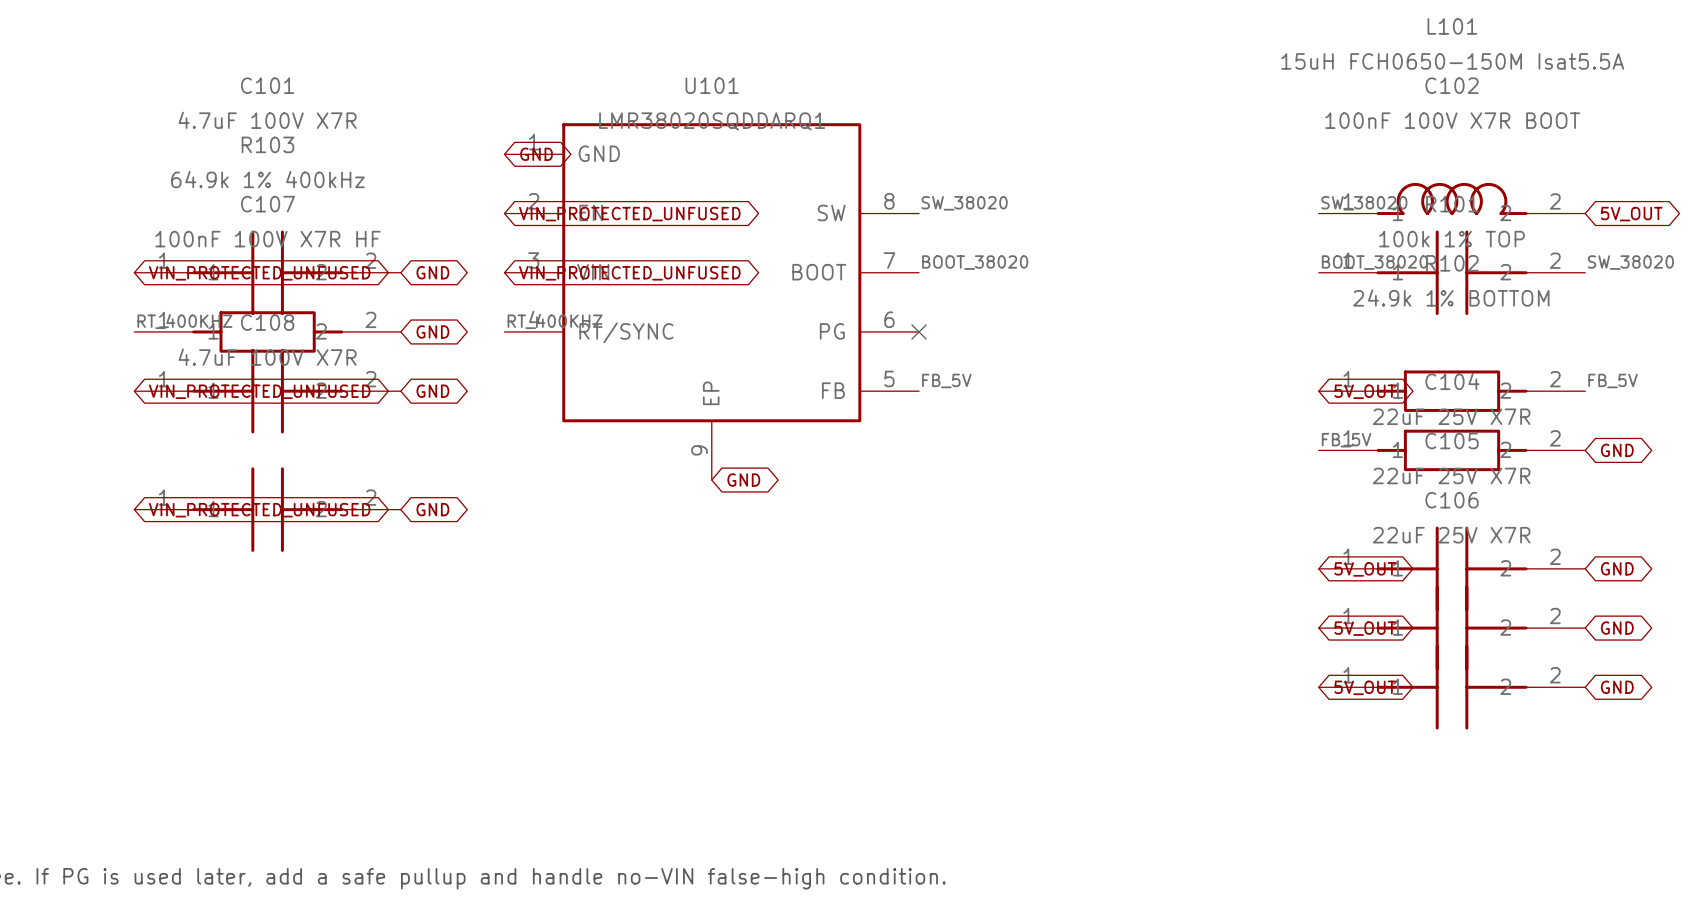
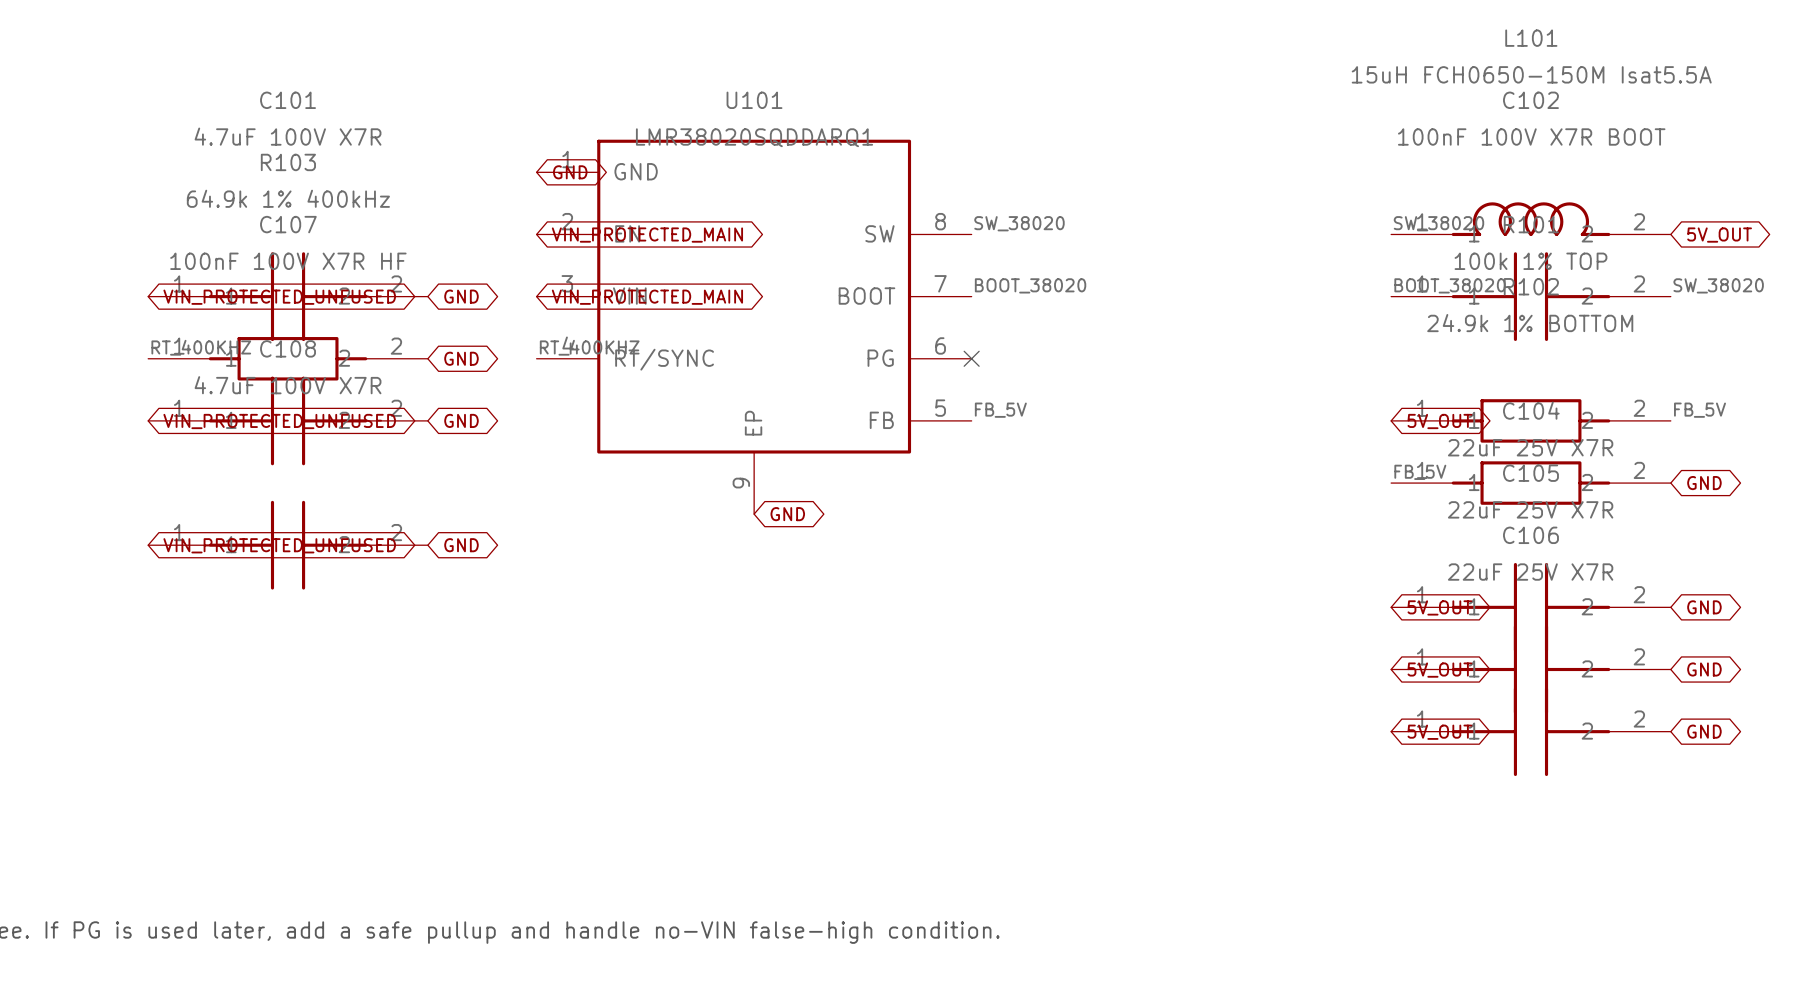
global label: VIN_PROTECTED_UNFUSED (629, 214) -> VIN_PROTECTED_MAIN (647, 235)
global label: VIN_PROTECTED_UNFUSED (629, 273) -> VIN_PROTECTED_MAIN (647, 297)

